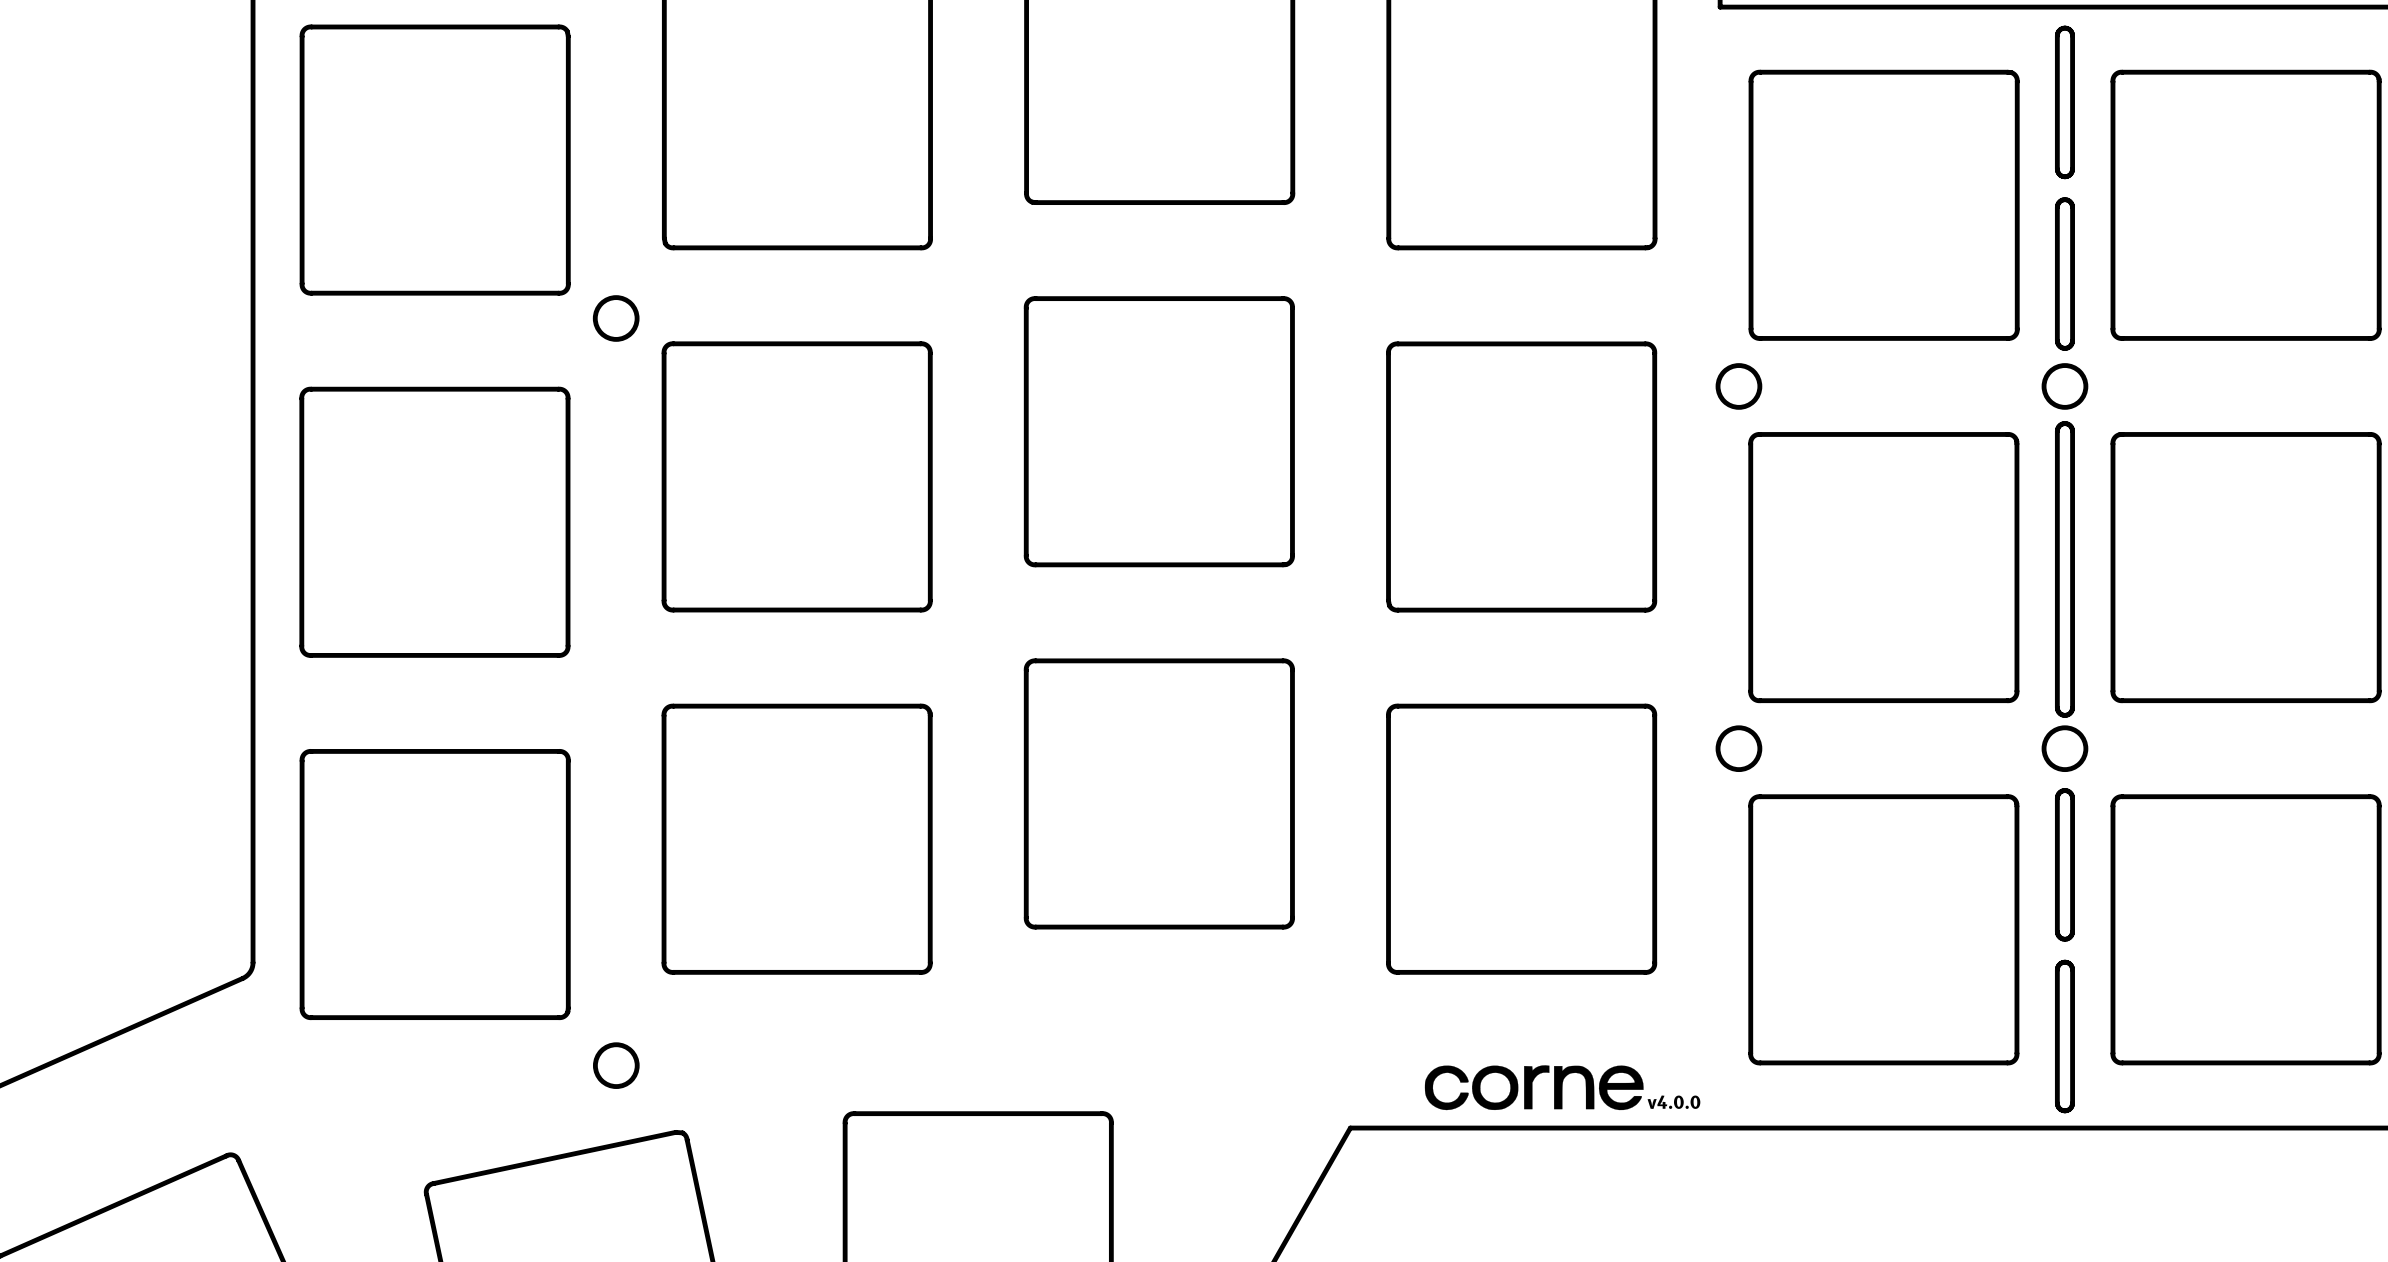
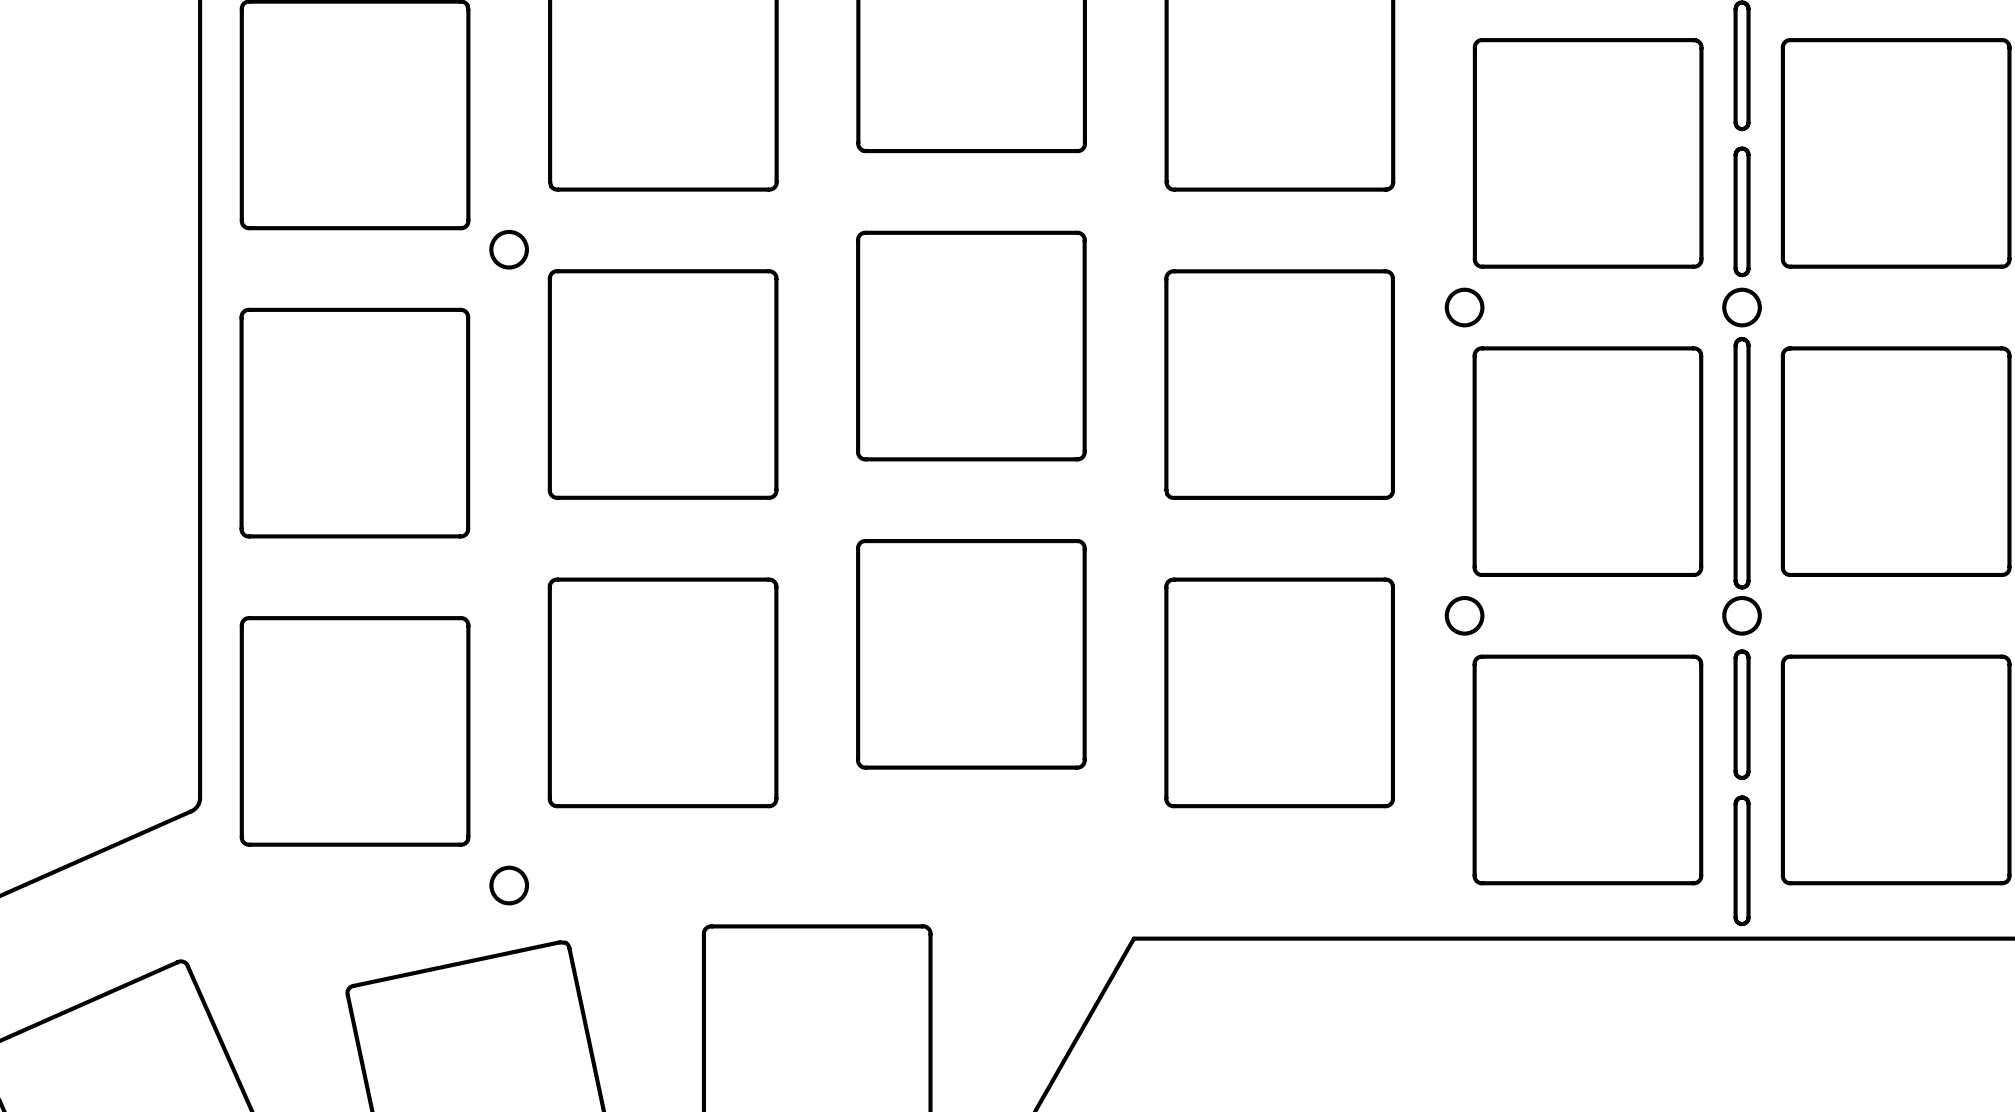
drawing: [1424, 1065, 1644, 1111] -> none
text: v4.0.0 (1673, 1102) -> none

